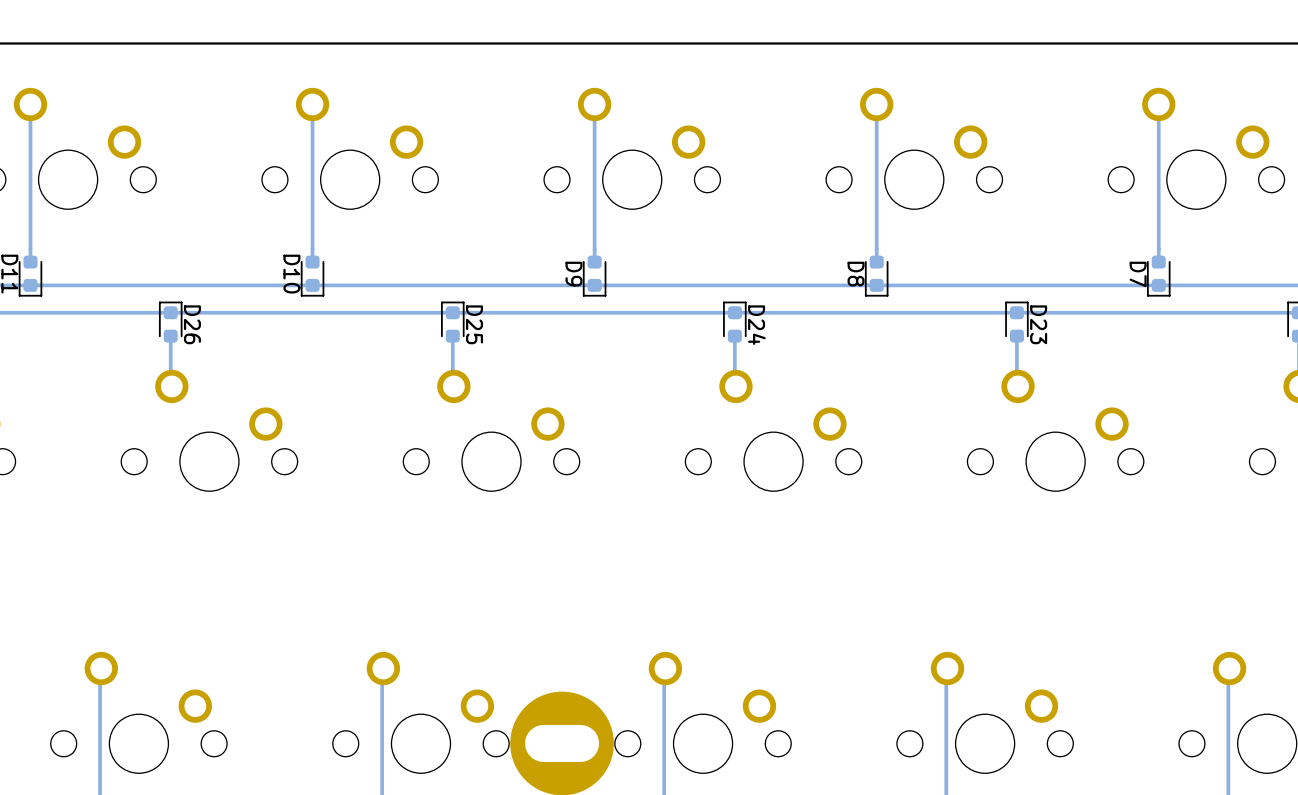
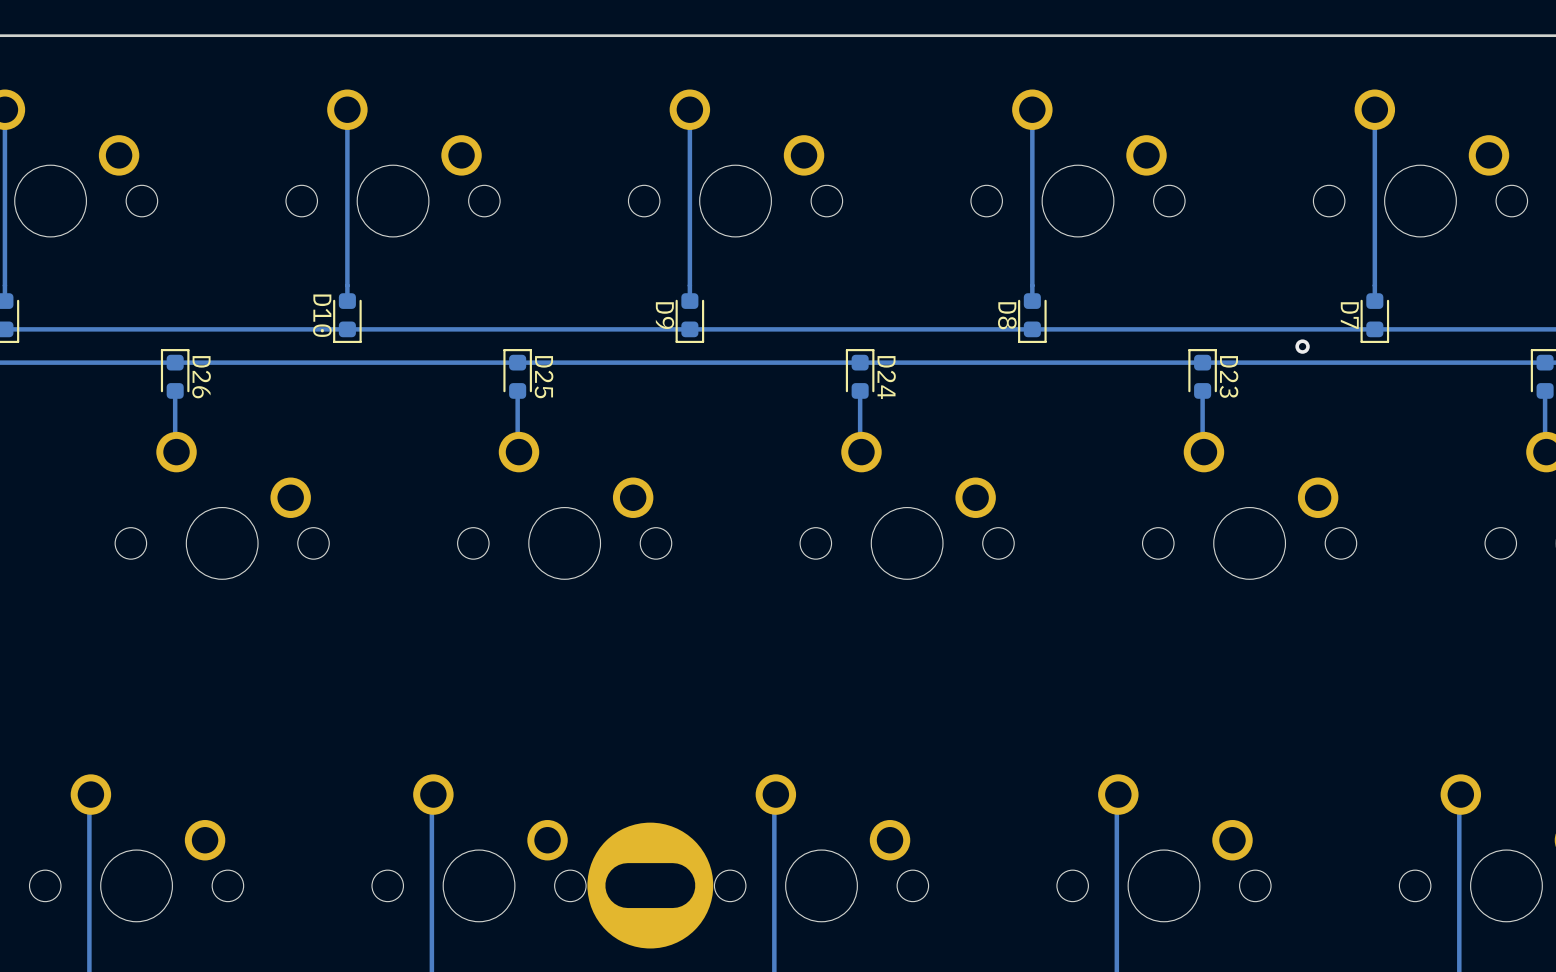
via: none -> (1302, 346)

